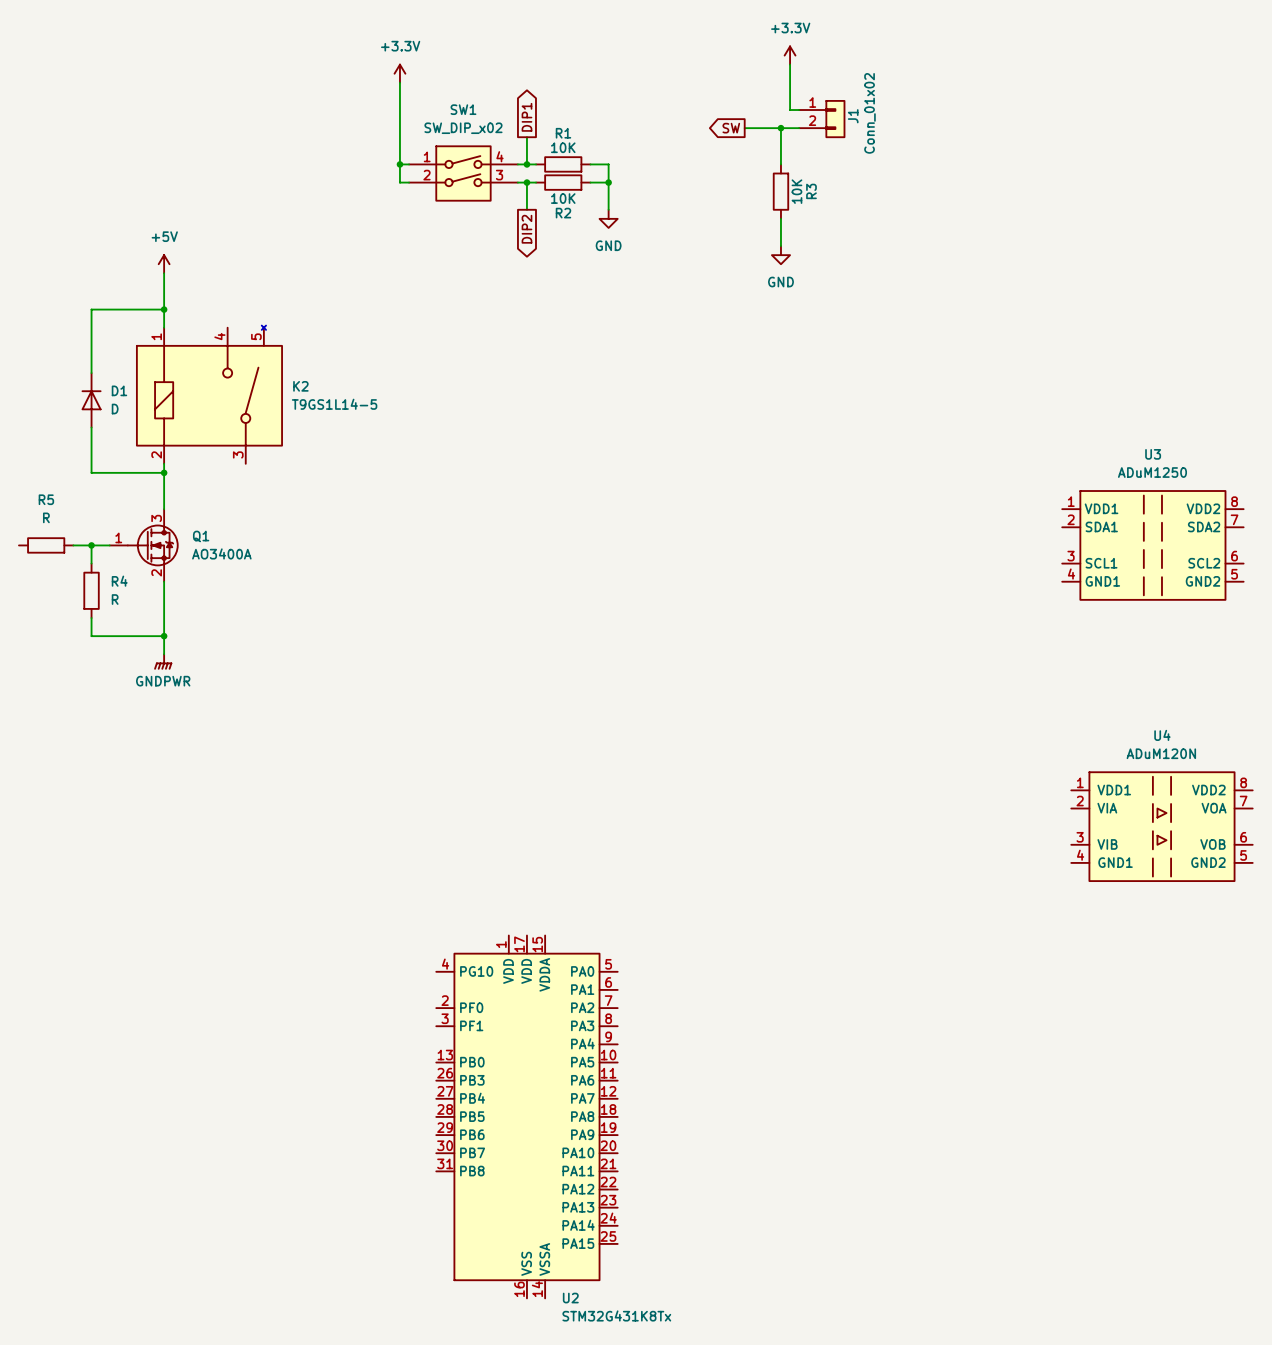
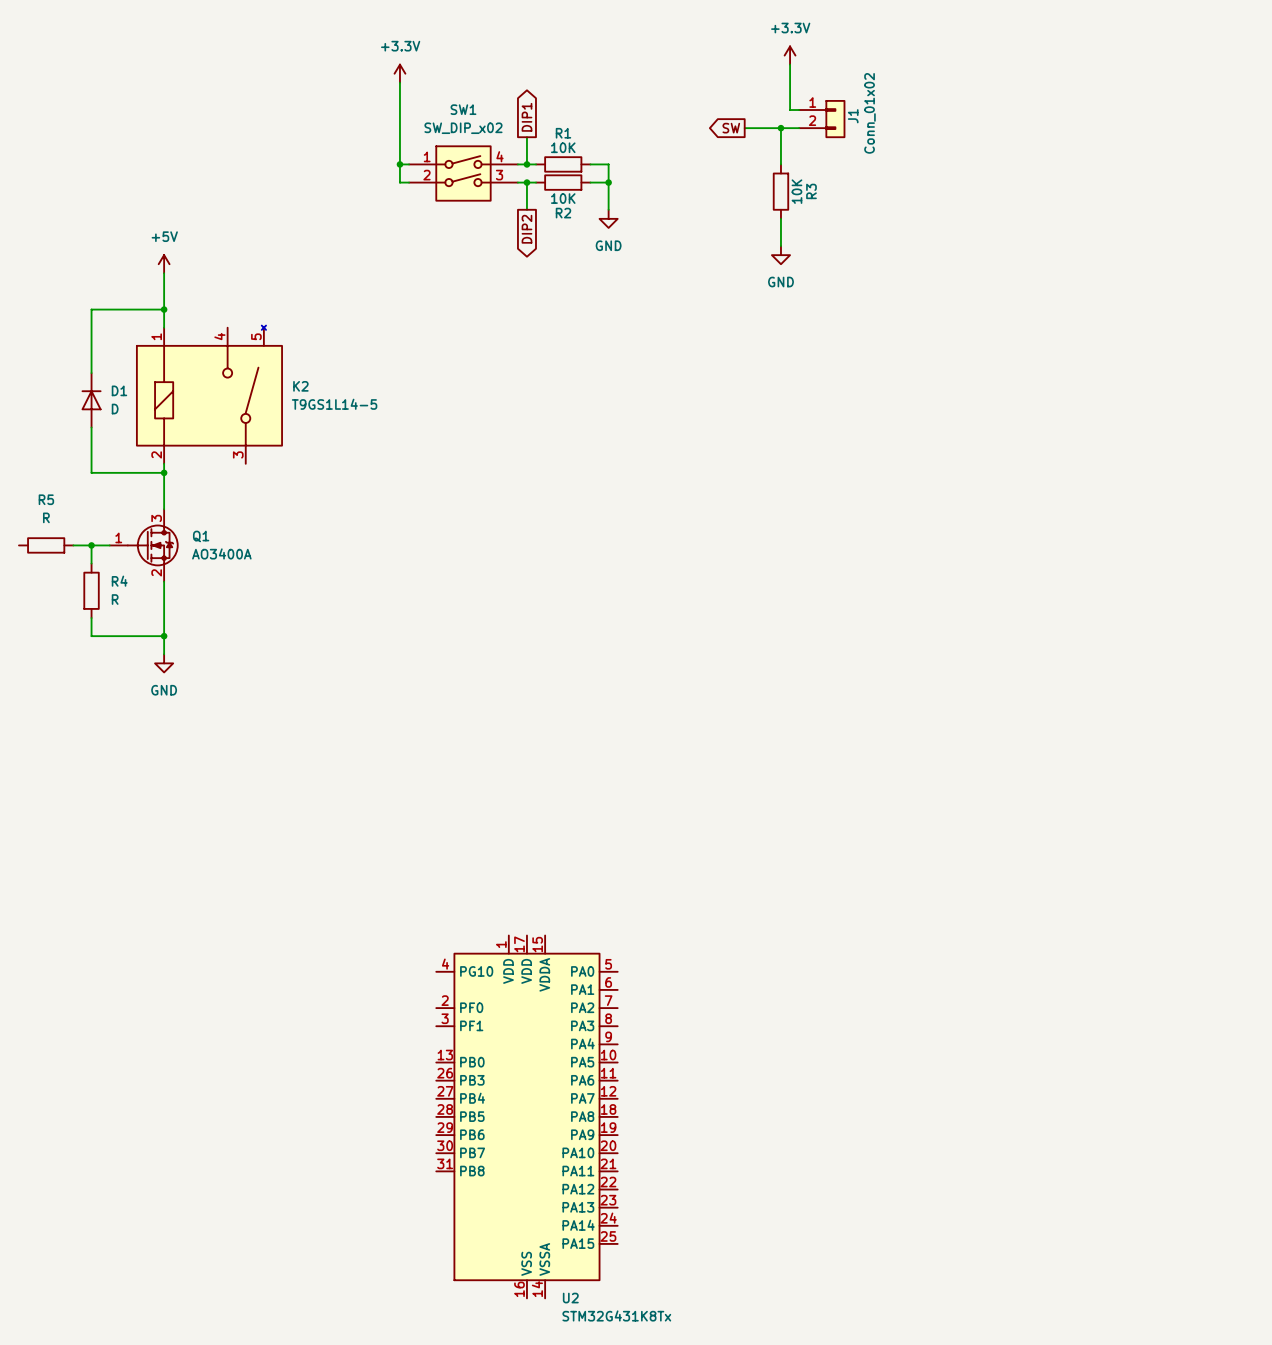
U3: ADuM1250 (1152, 545) -> none
power symbol: GNDPWR (163, 661) -> GND (164, 663)
U4: ADuM120N (1161, 826) -> none

